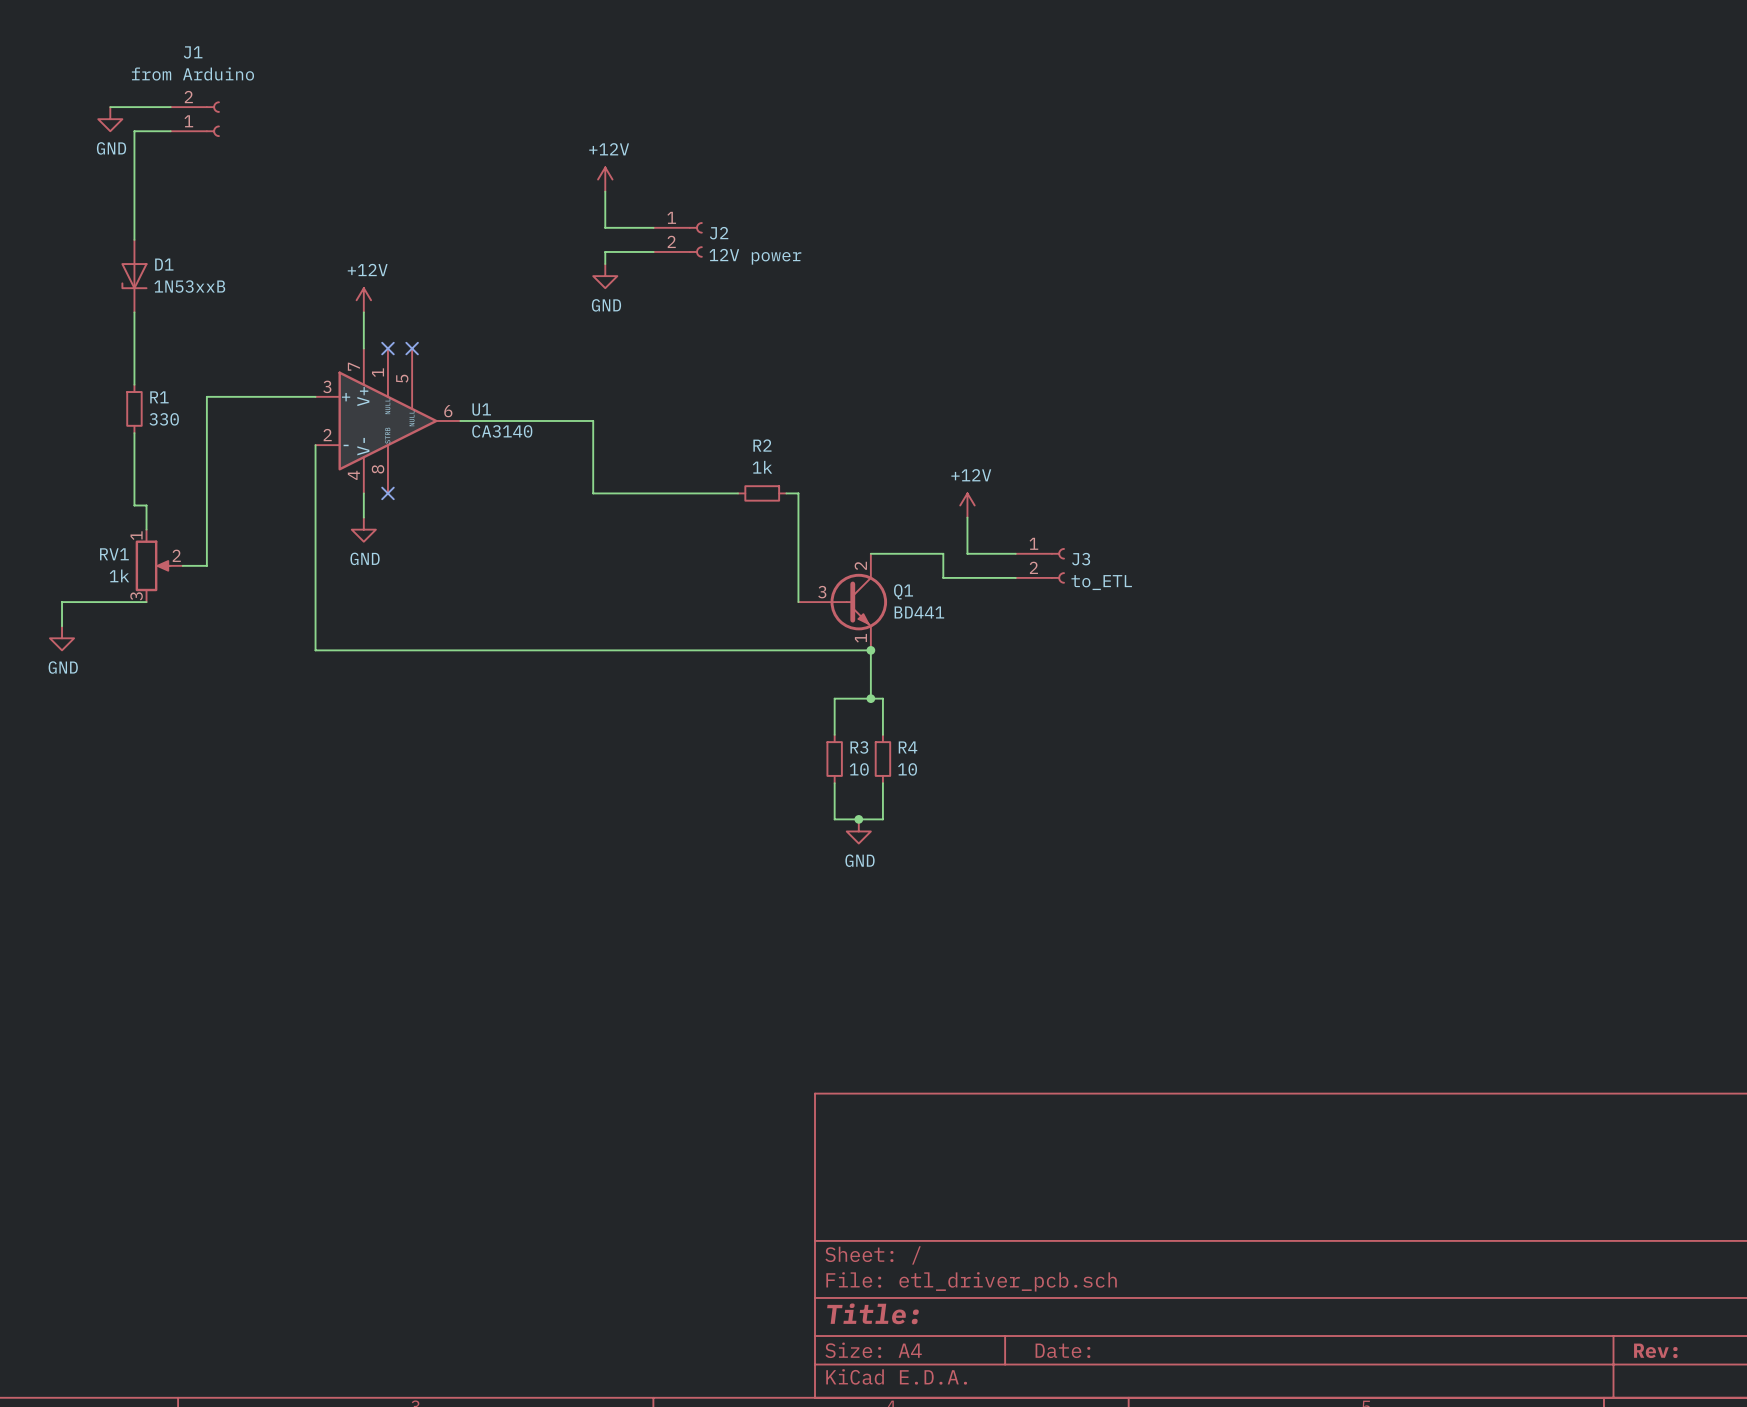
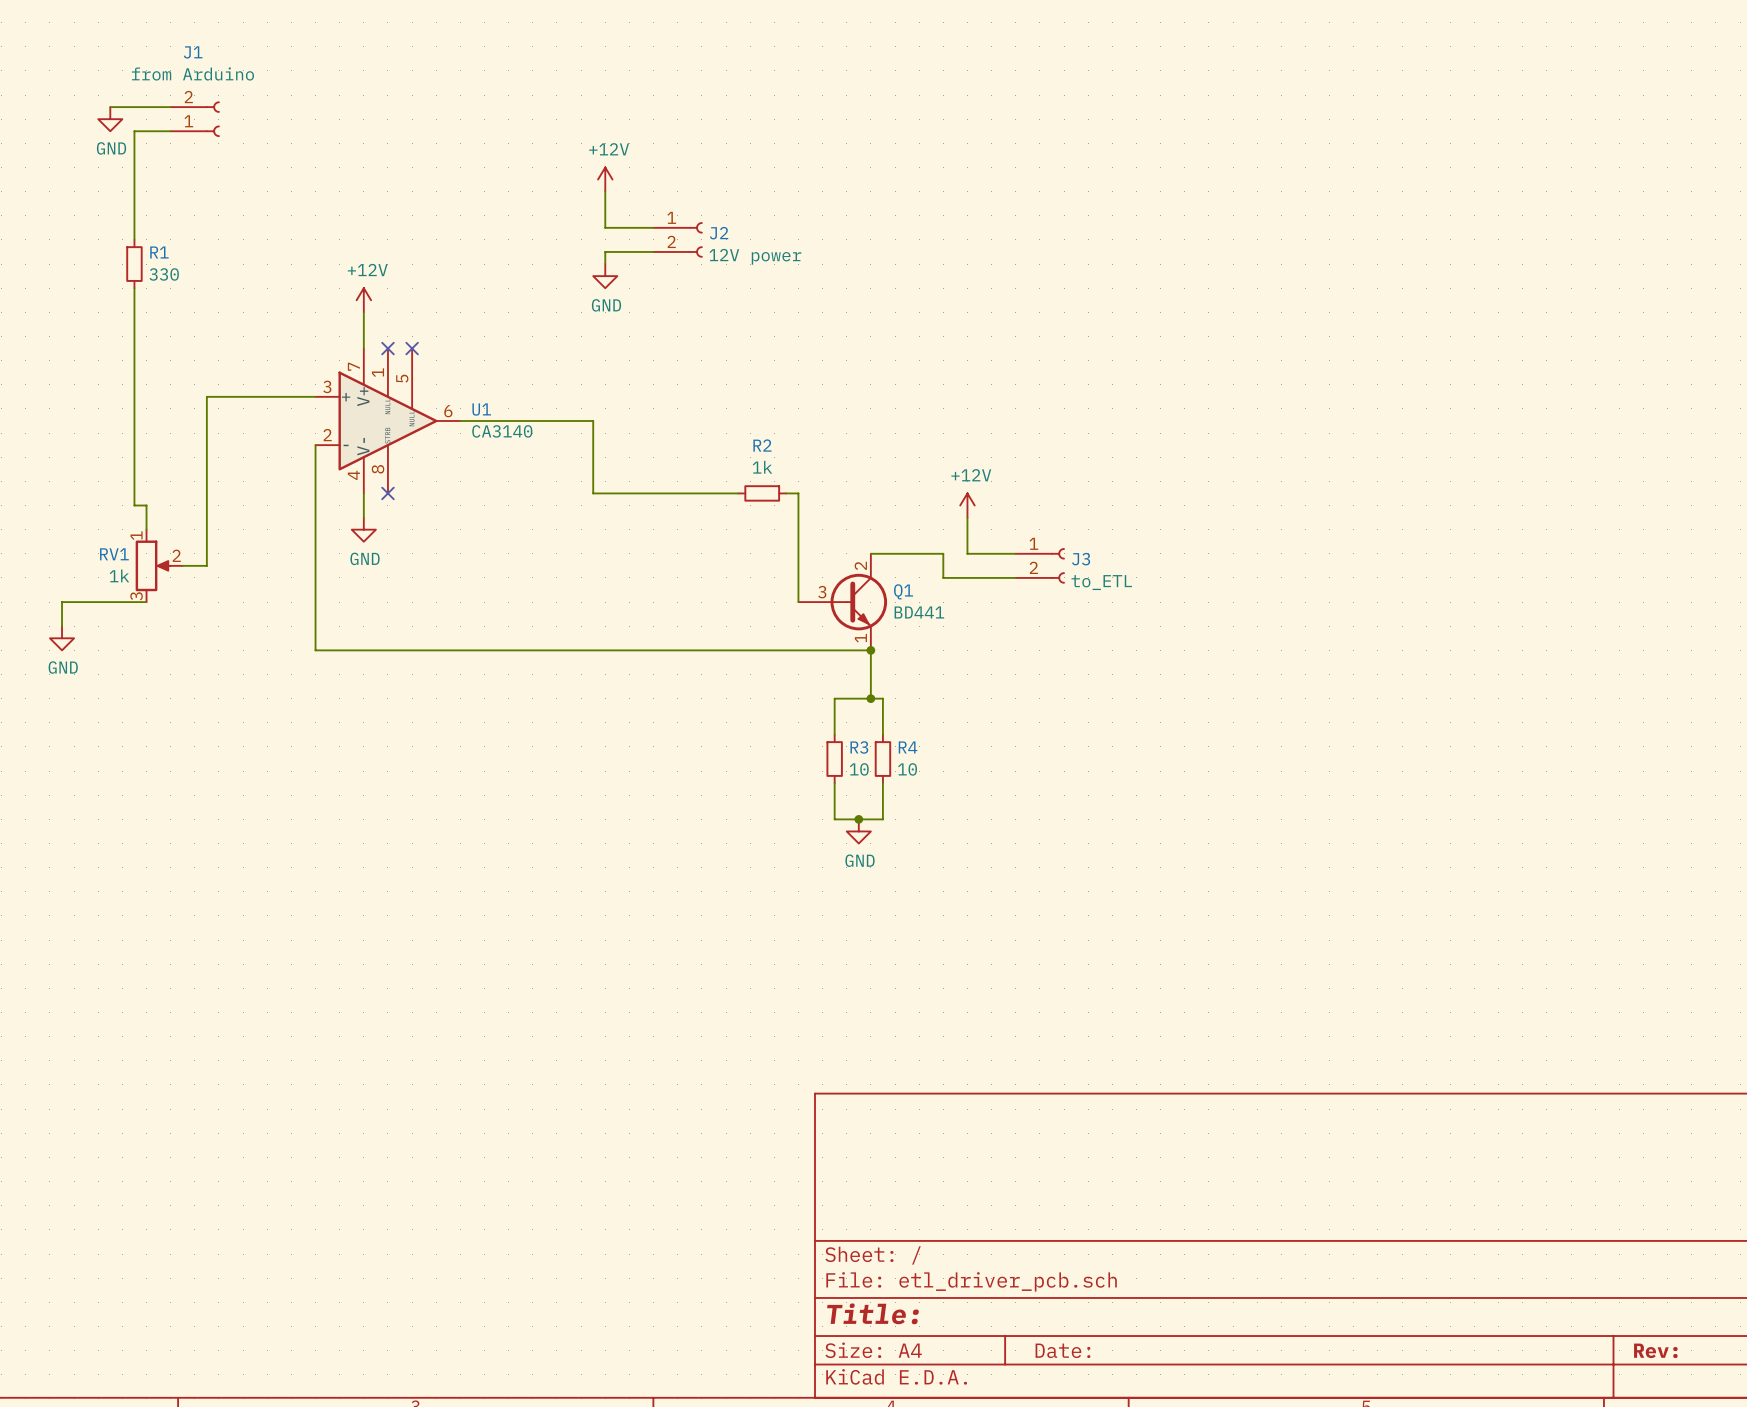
D1: 1N53xxB (134, 276) -> none
wire: none -> (134, 384) (134, 433)
R1 position: (134, 408) -> (134, 264)

